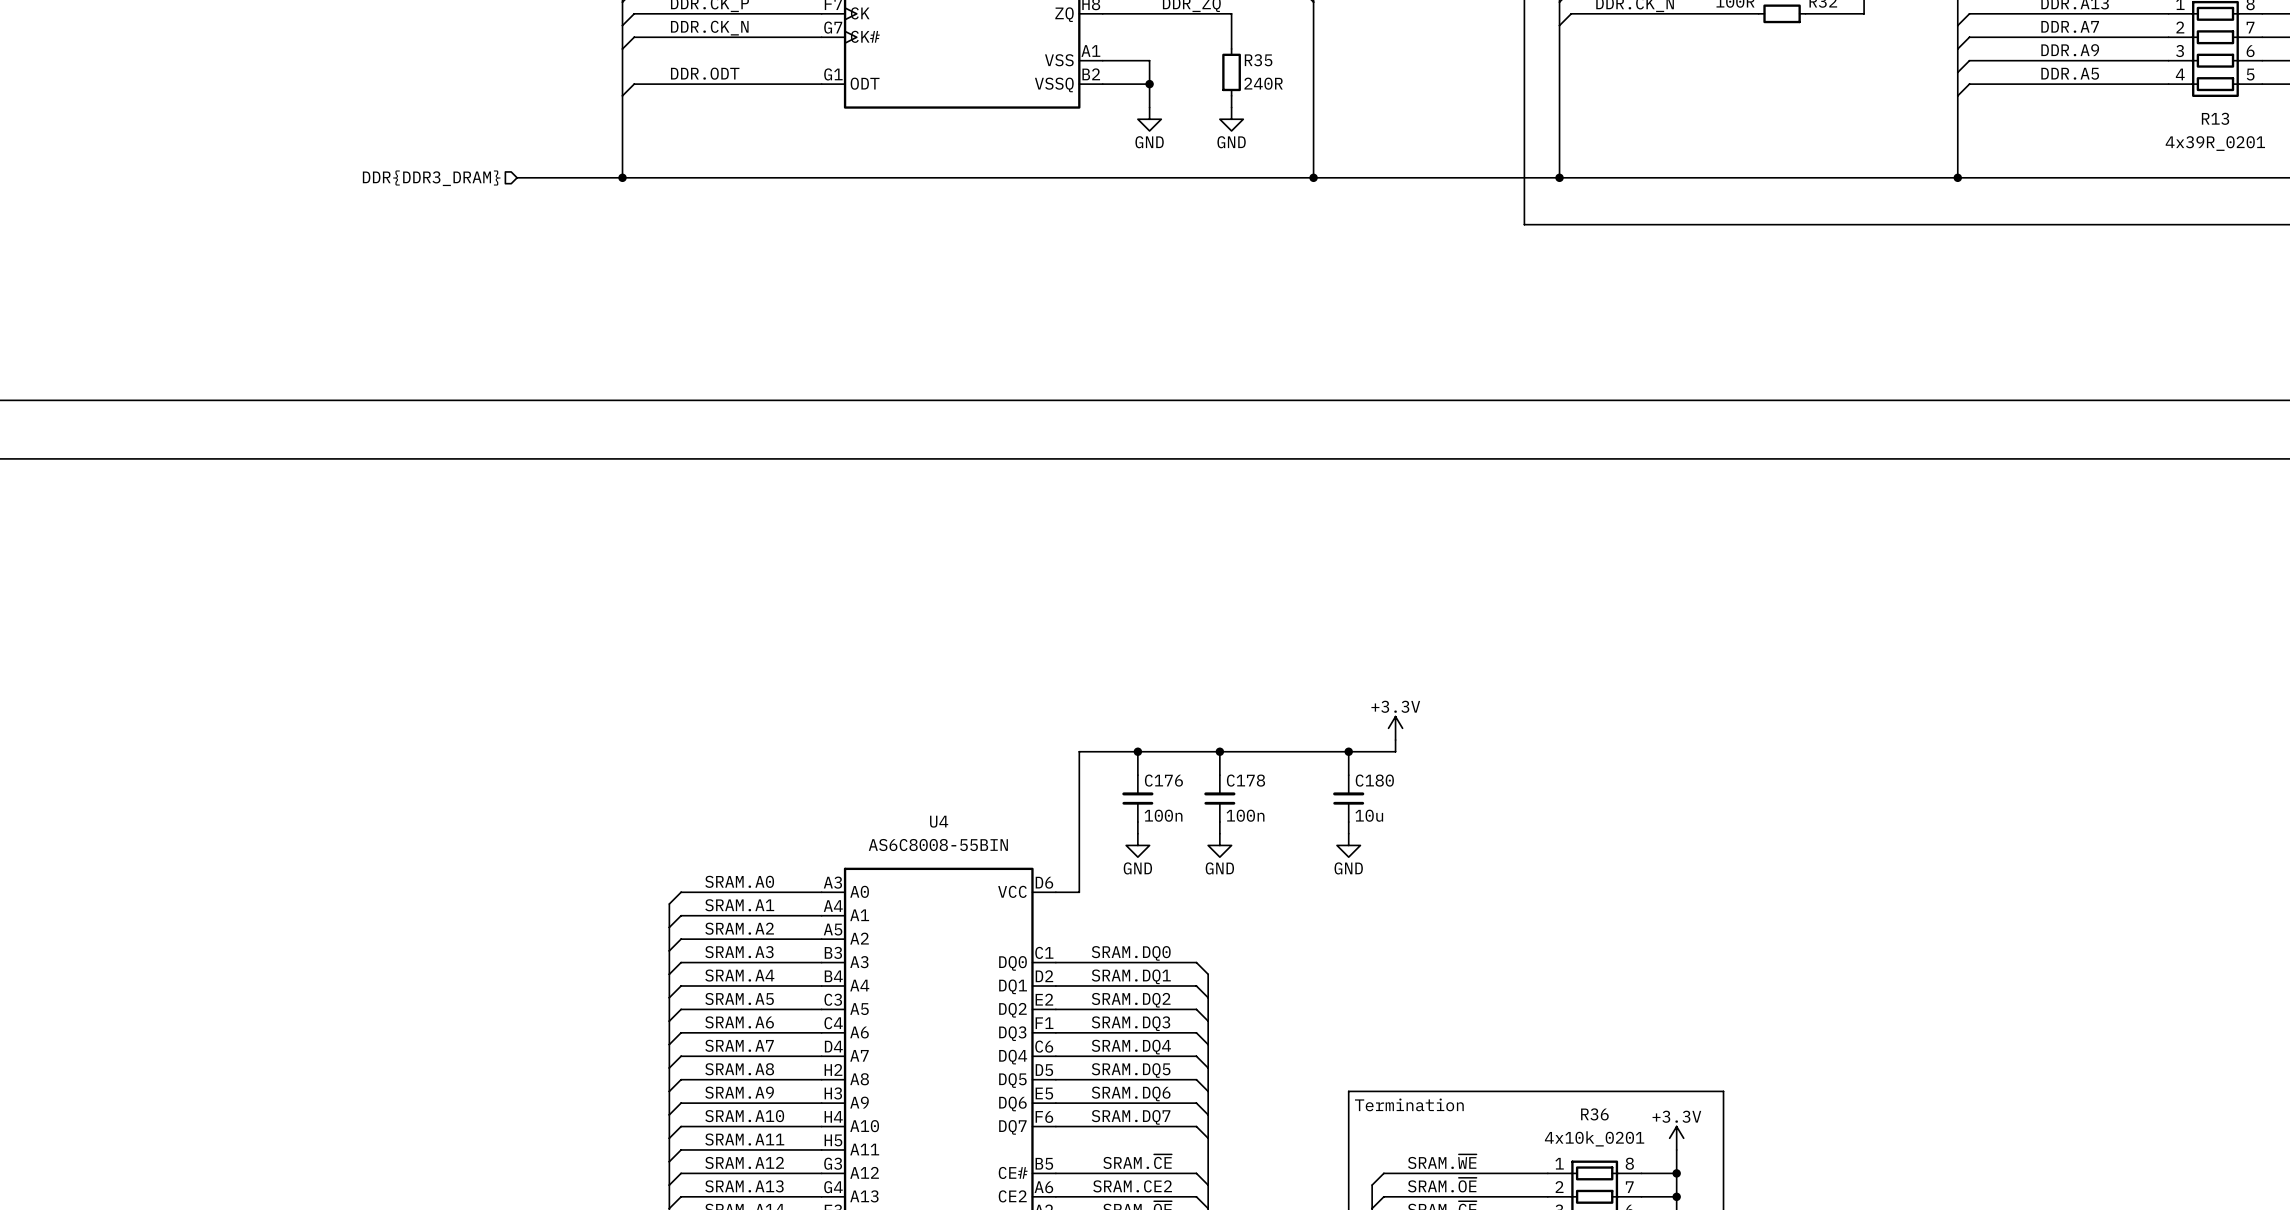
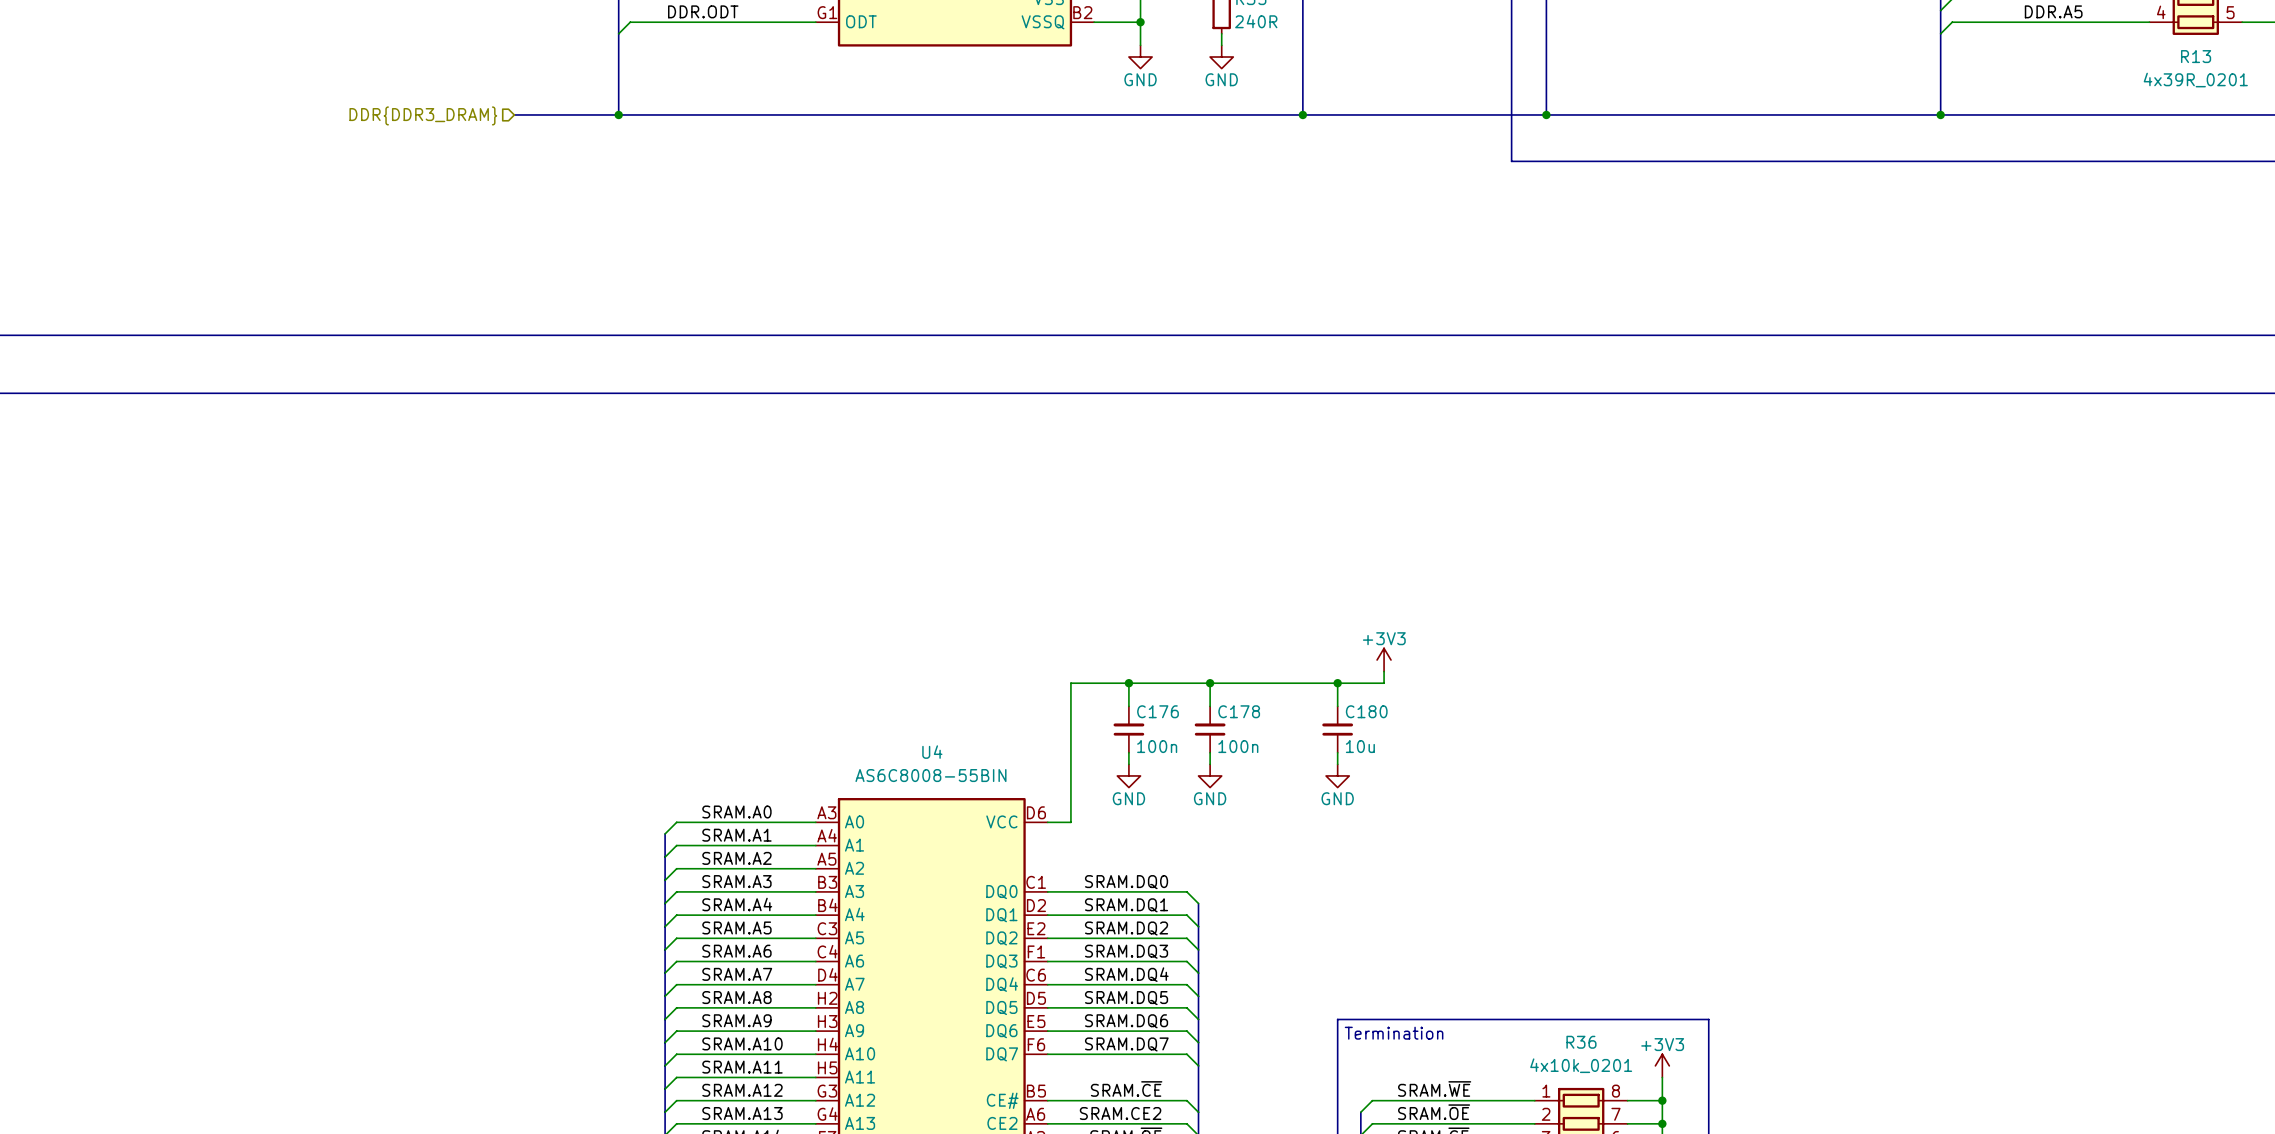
power symbol: +3.3V (1395, 728) -> +3V3 (1384, 660)
power symbol: +3.3V (1676, 1138) -> +3V3 (1662, 1065)

